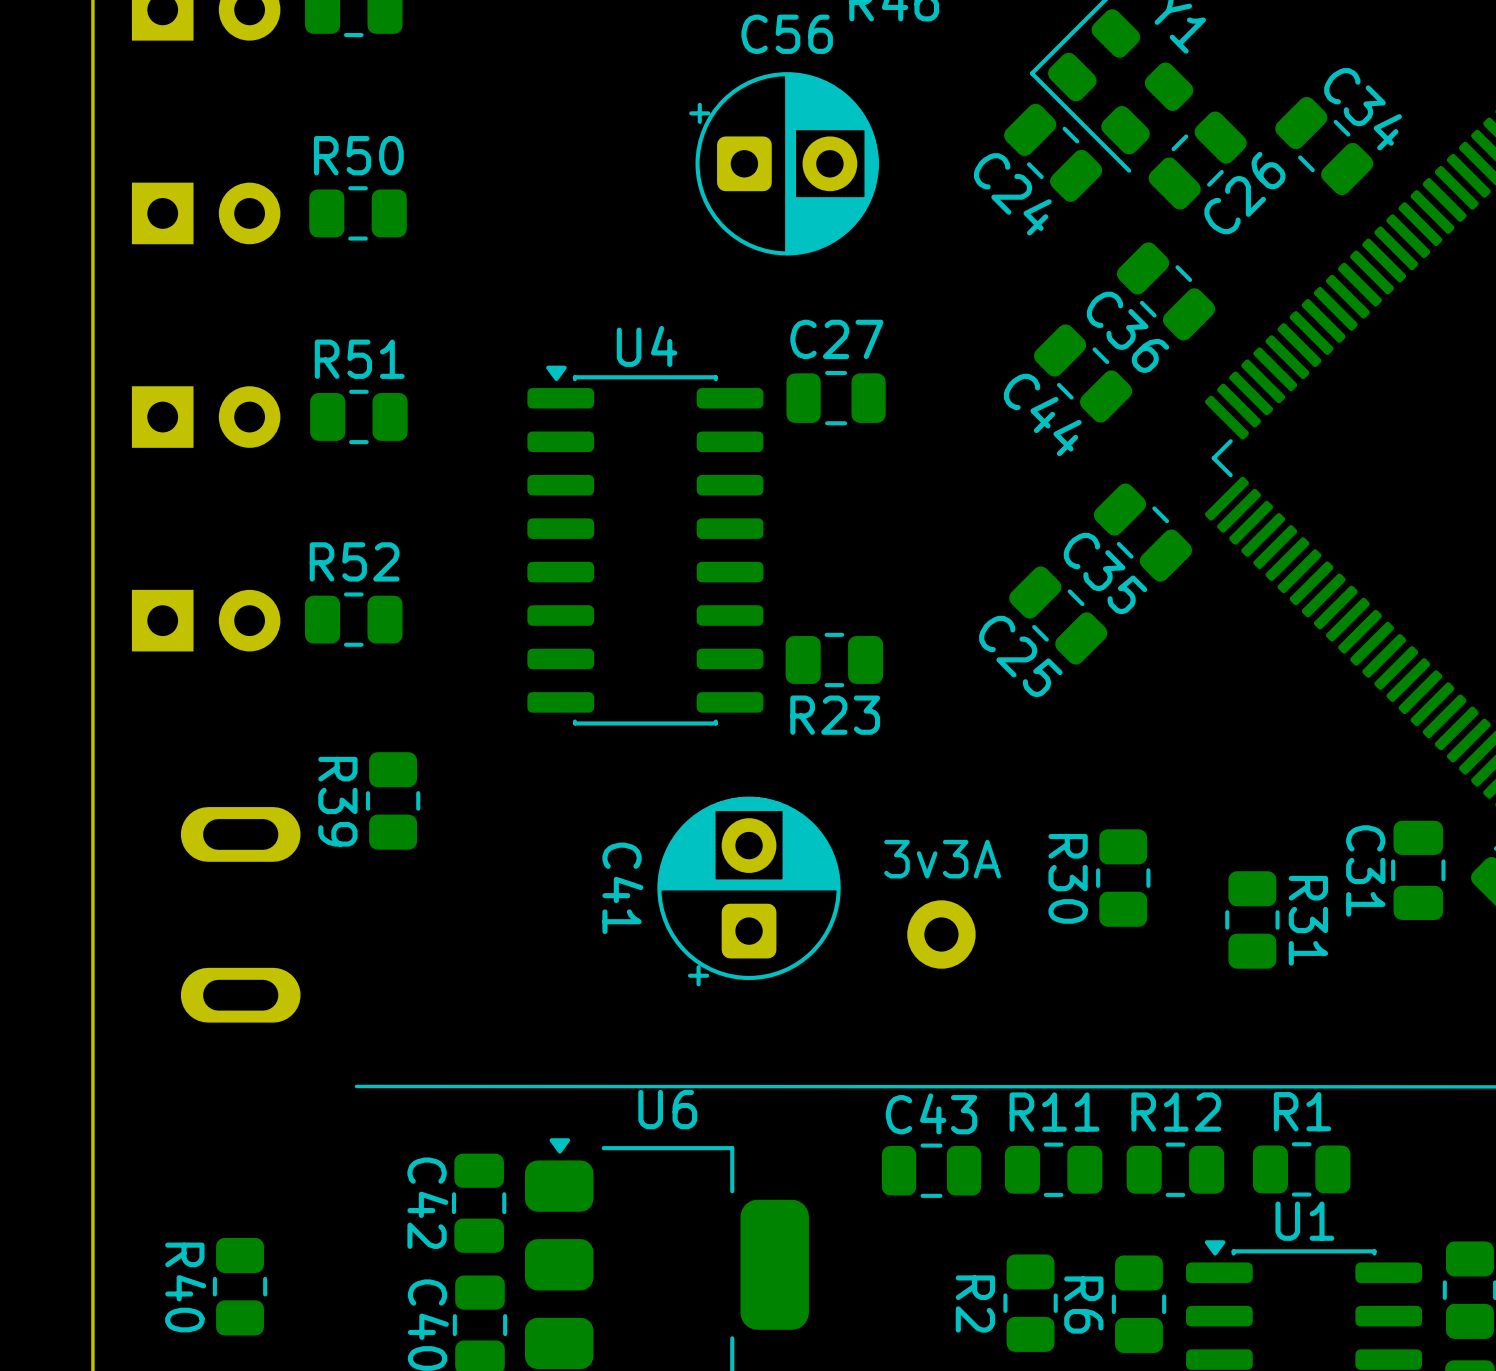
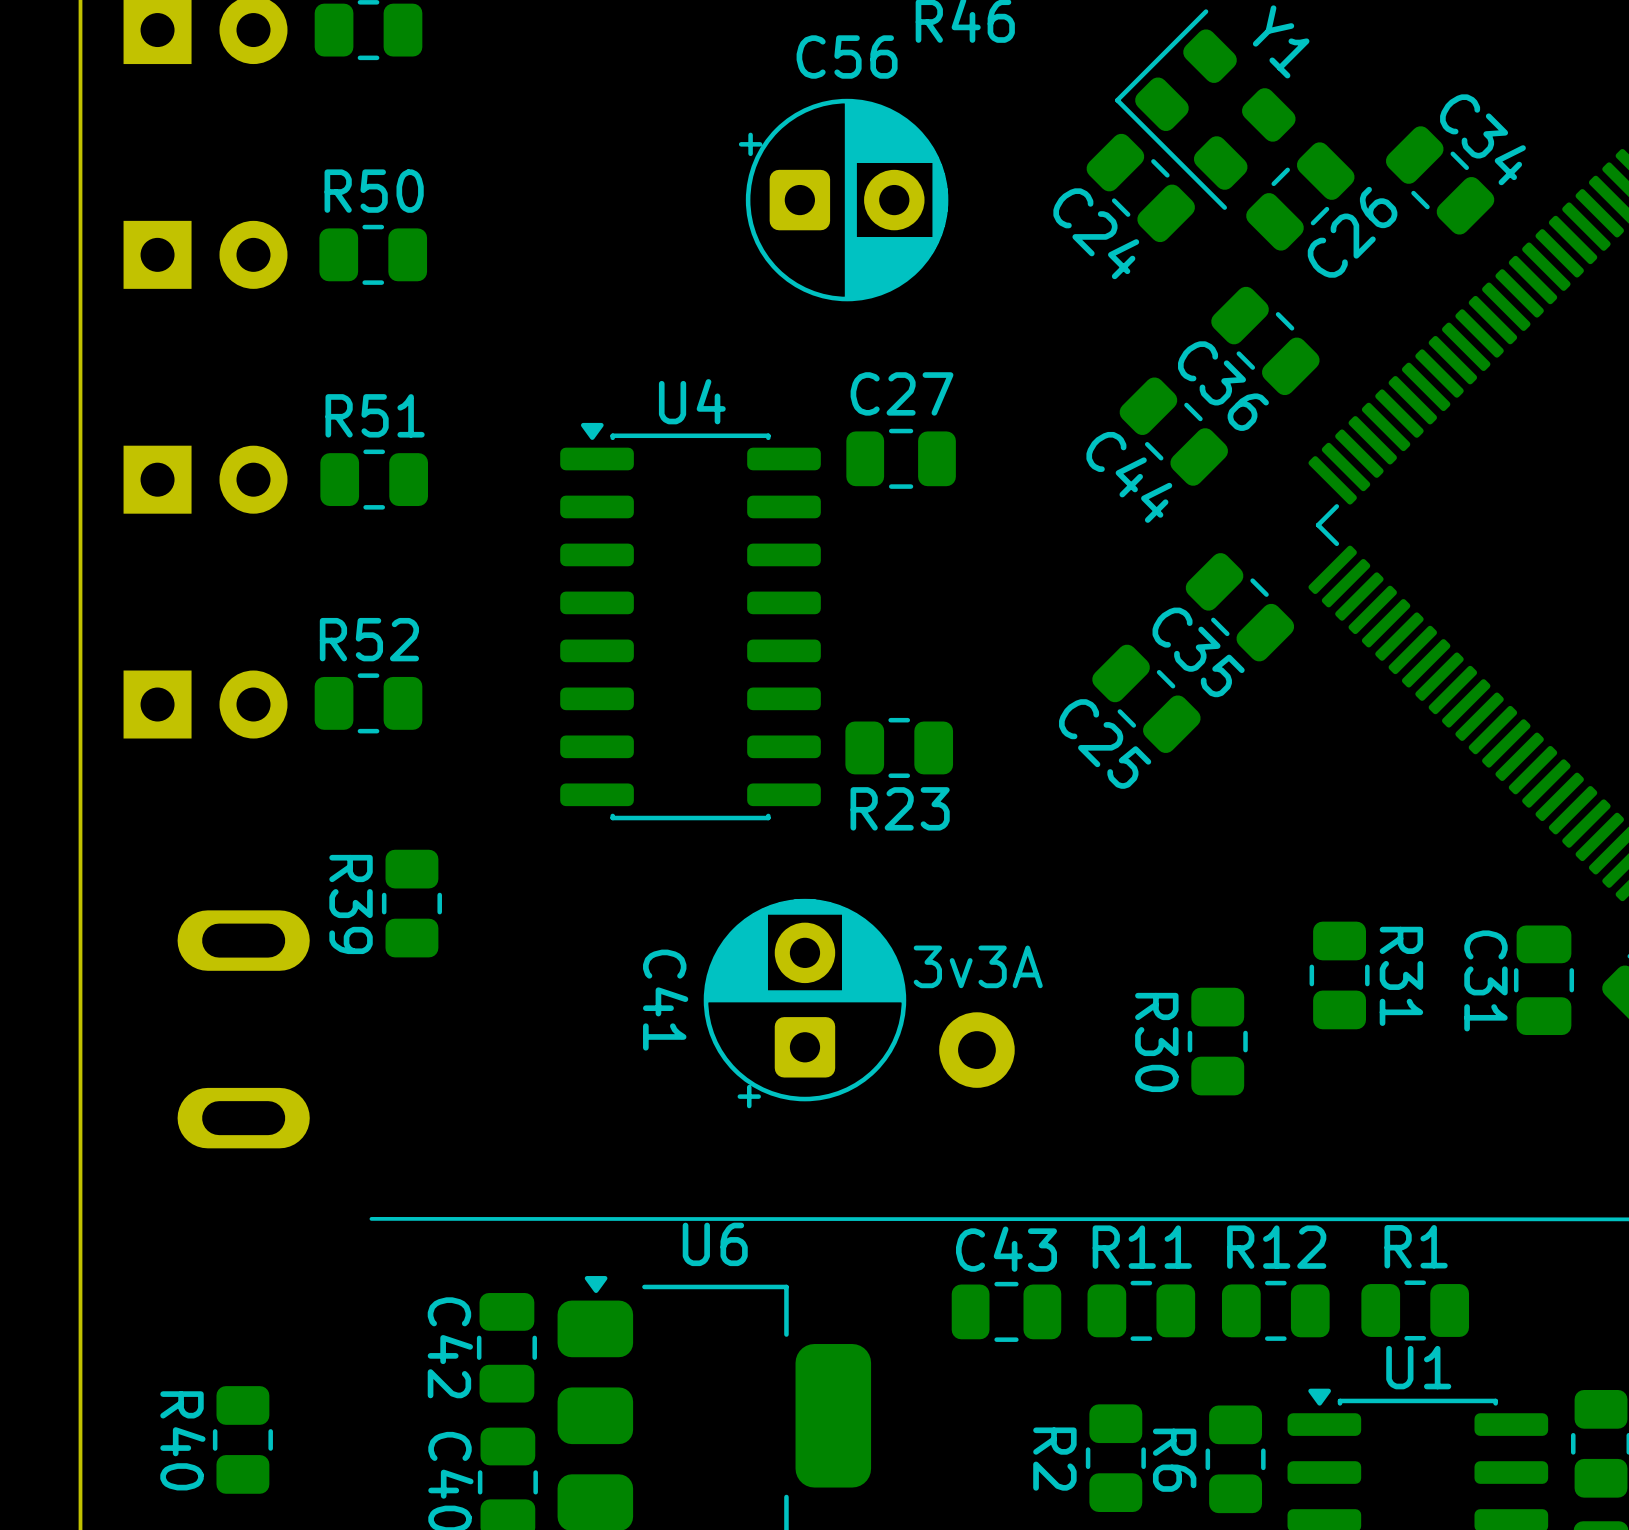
R30 position: (1123, 878) -> (1217, 1041)
R31 position: (1252, 919) -> (1339, 975)
part position: (941, 934) -> (976, 1050)

